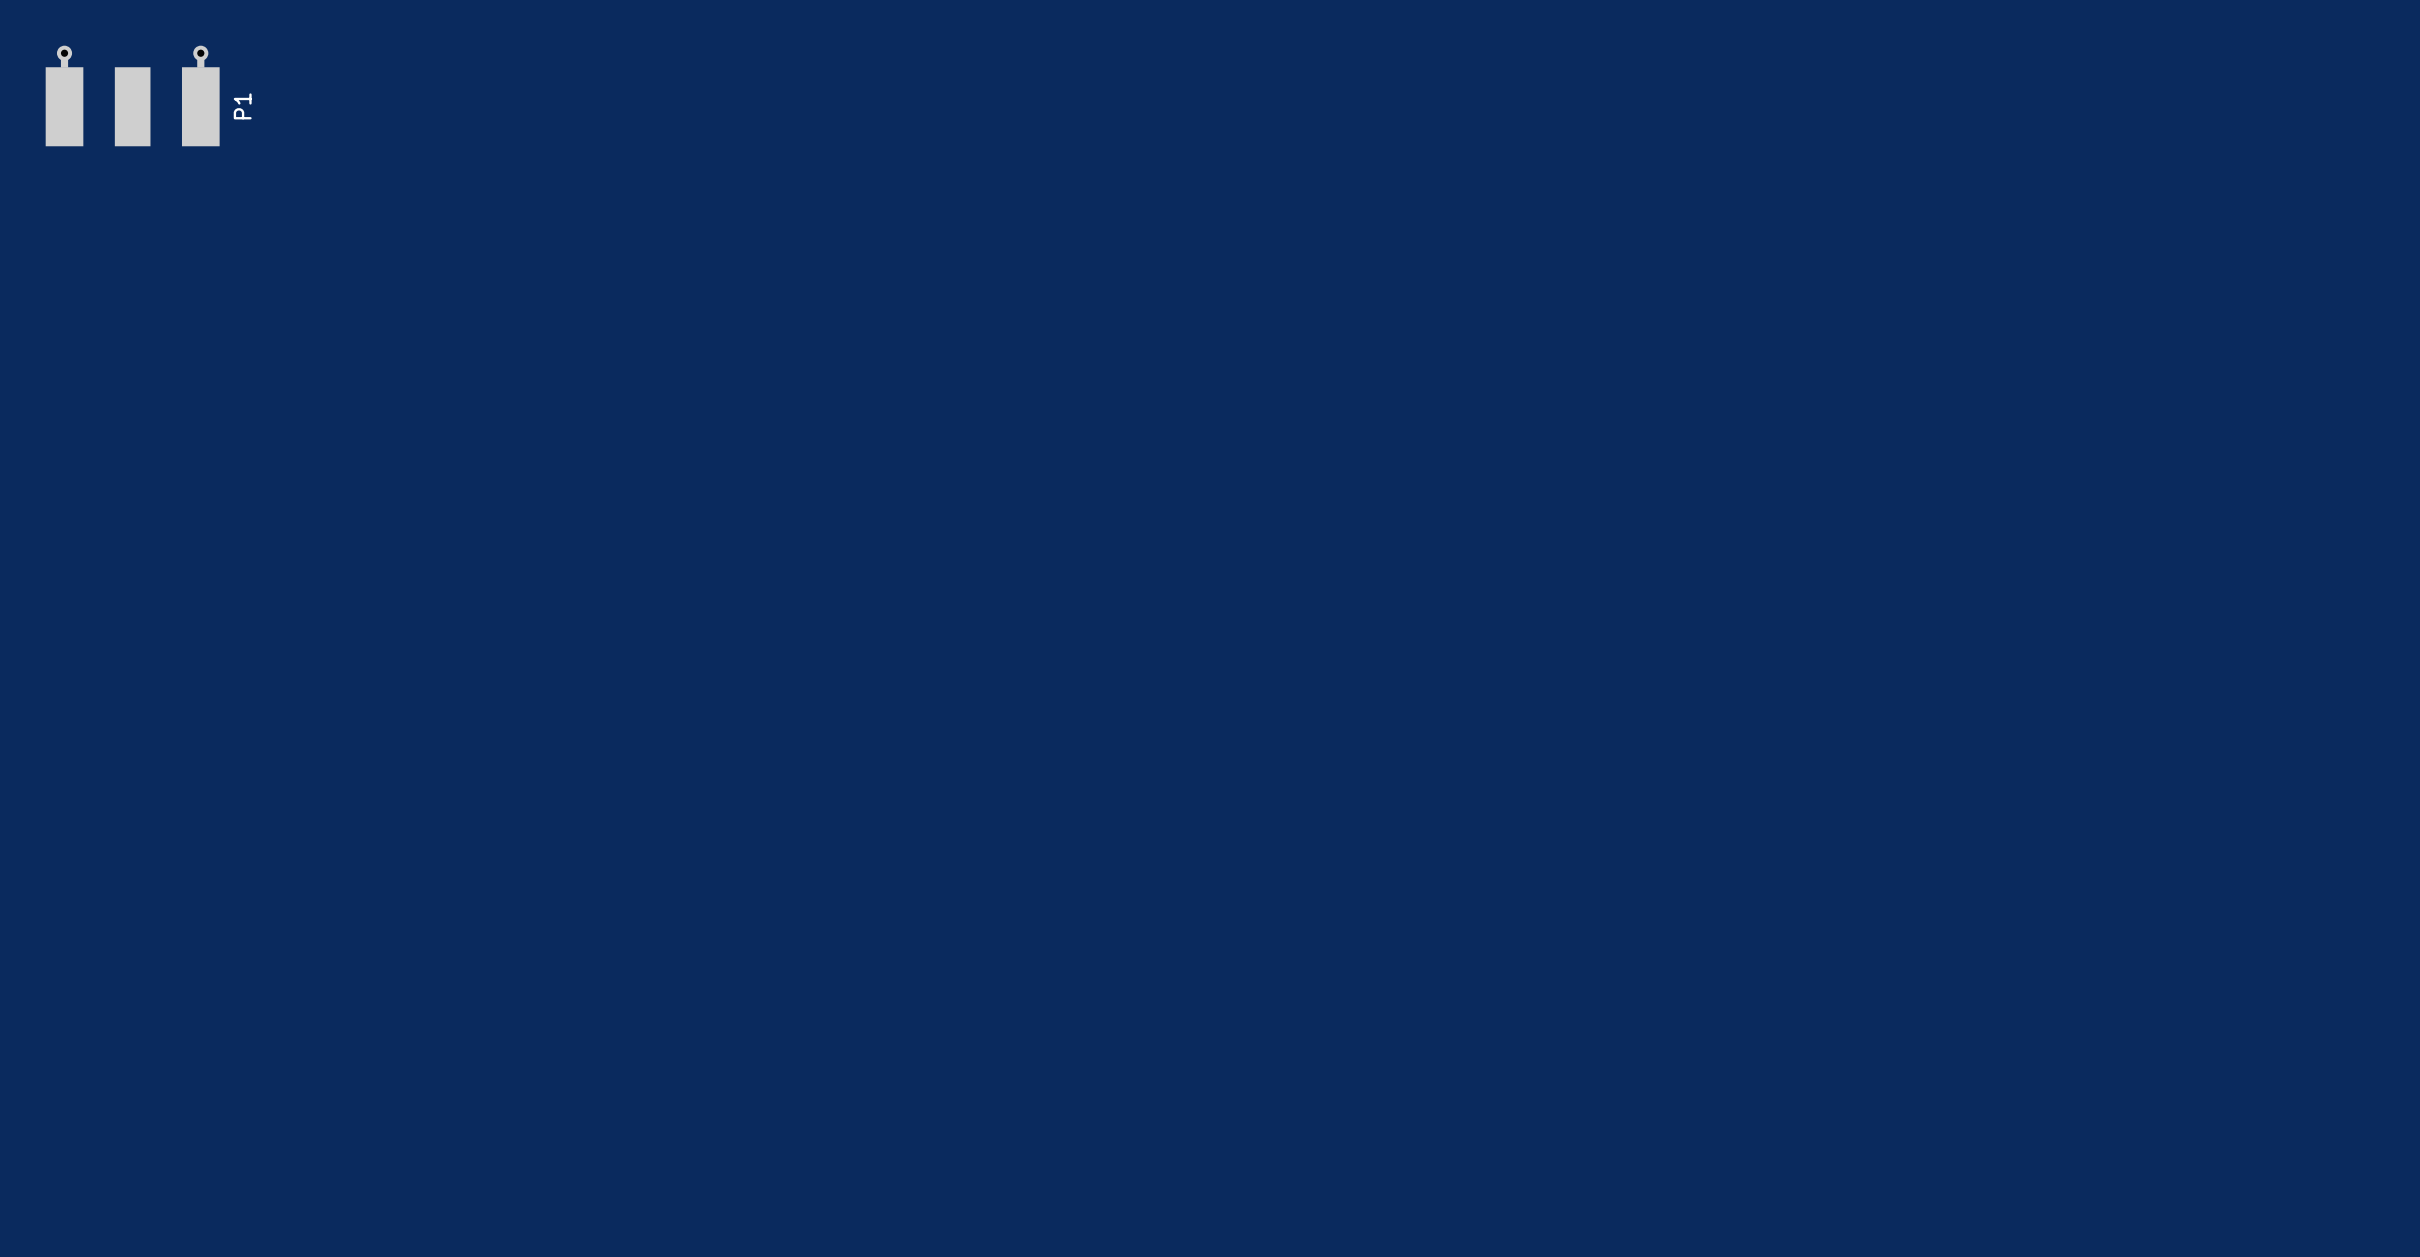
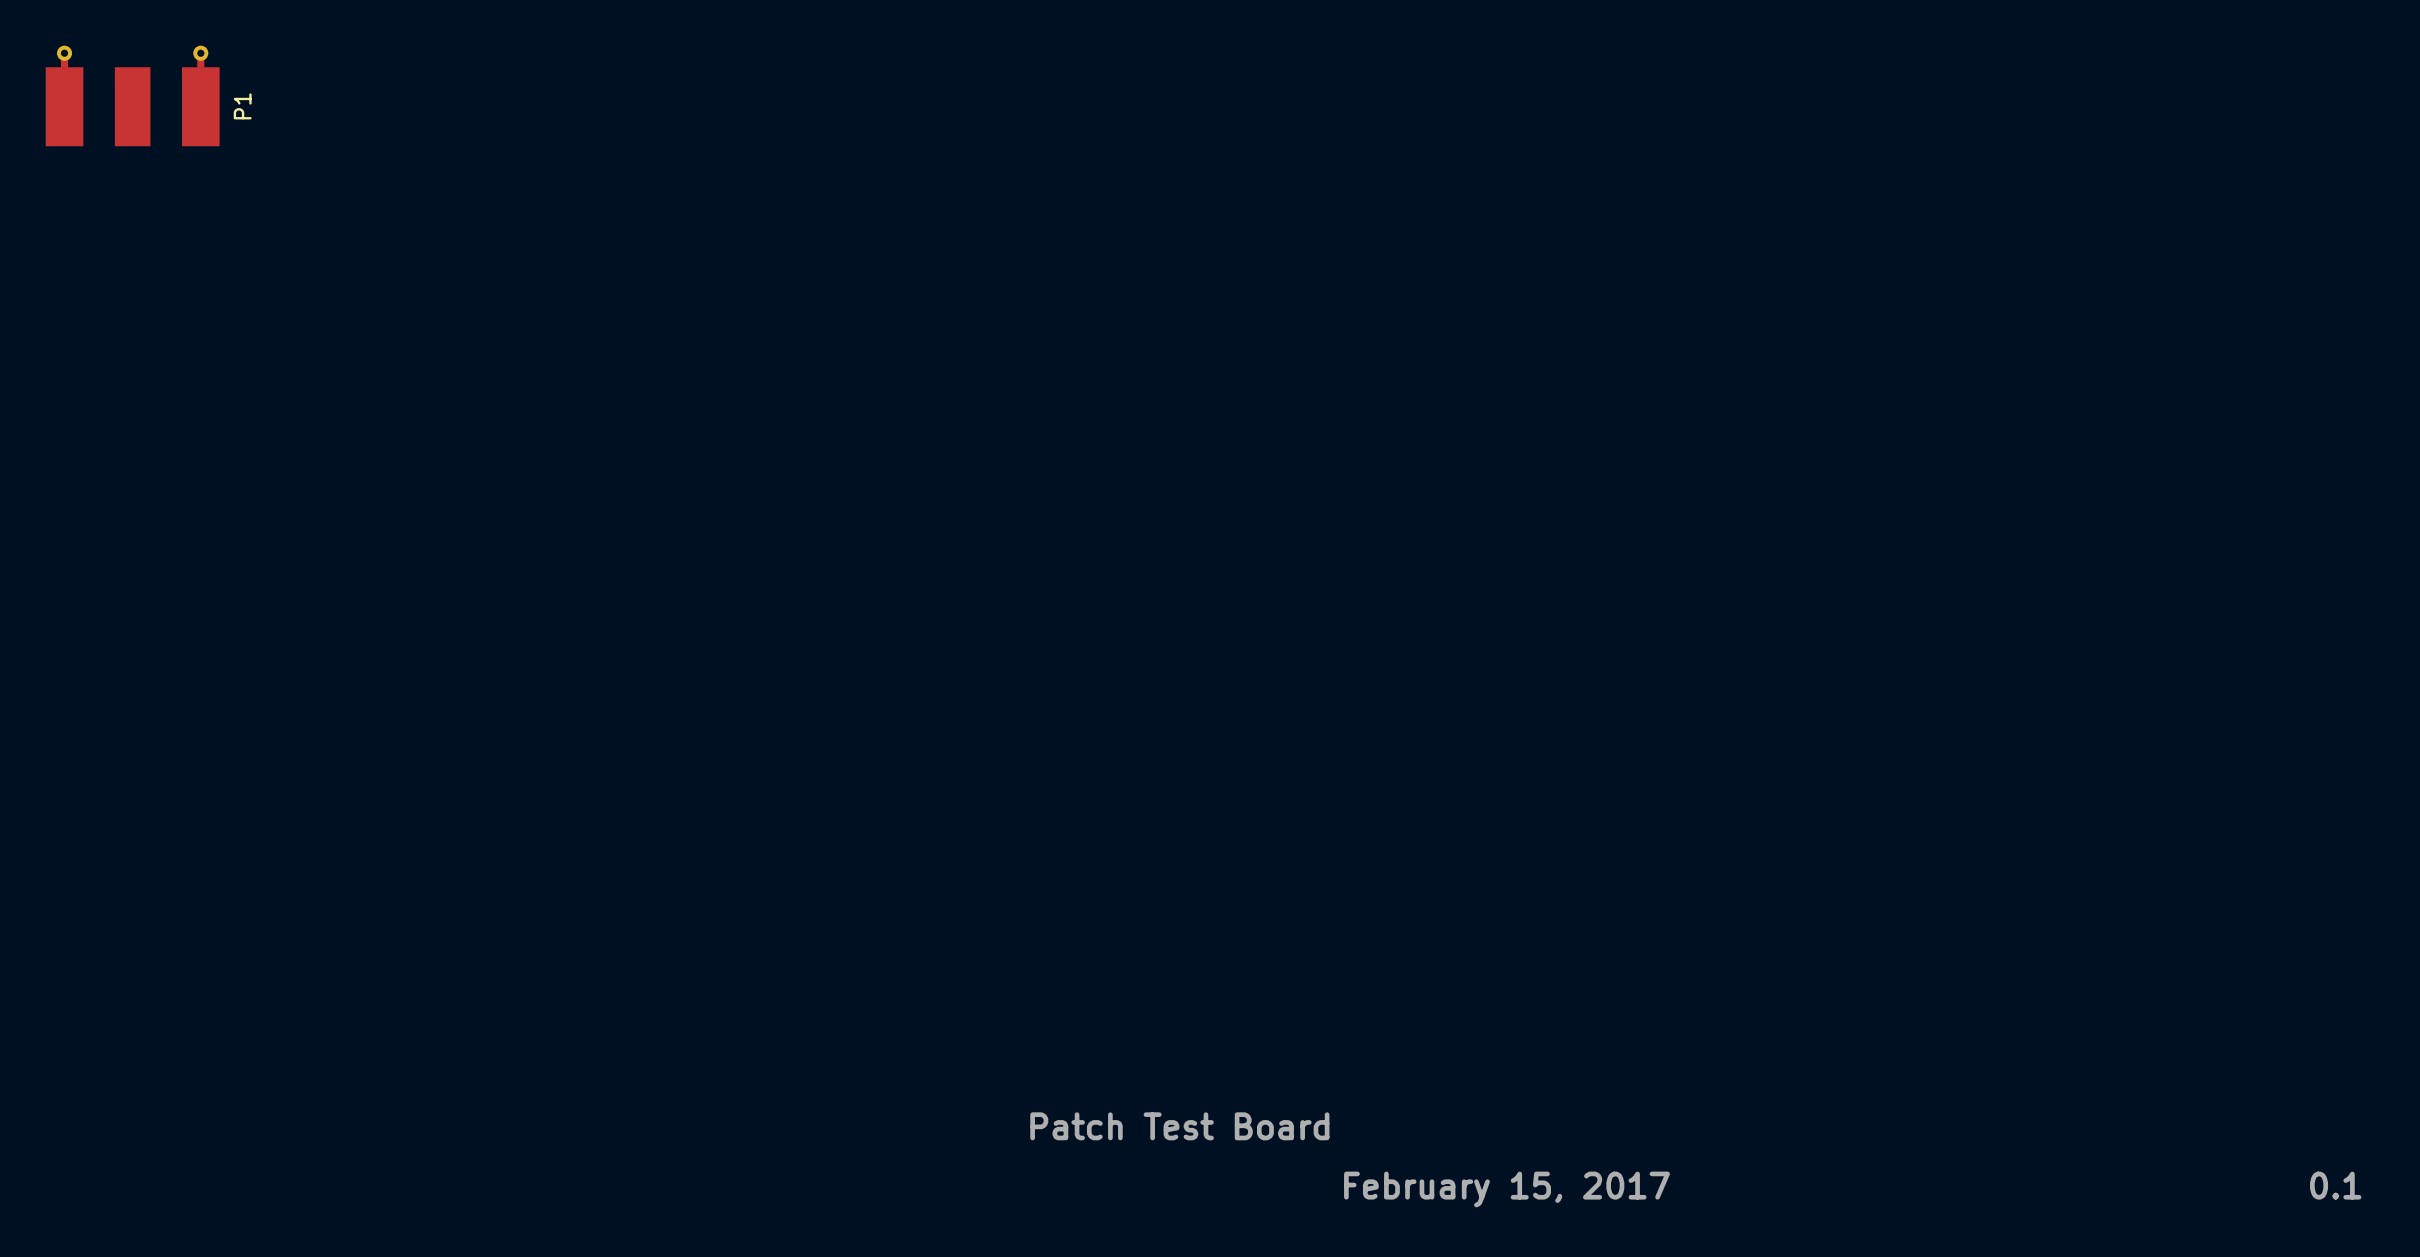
text: none -> Patch Test Board (1179, 1126)
text: none -> 0.1 (2335, 1185)
text: none -> February 15, 2017 (1506, 1189)

